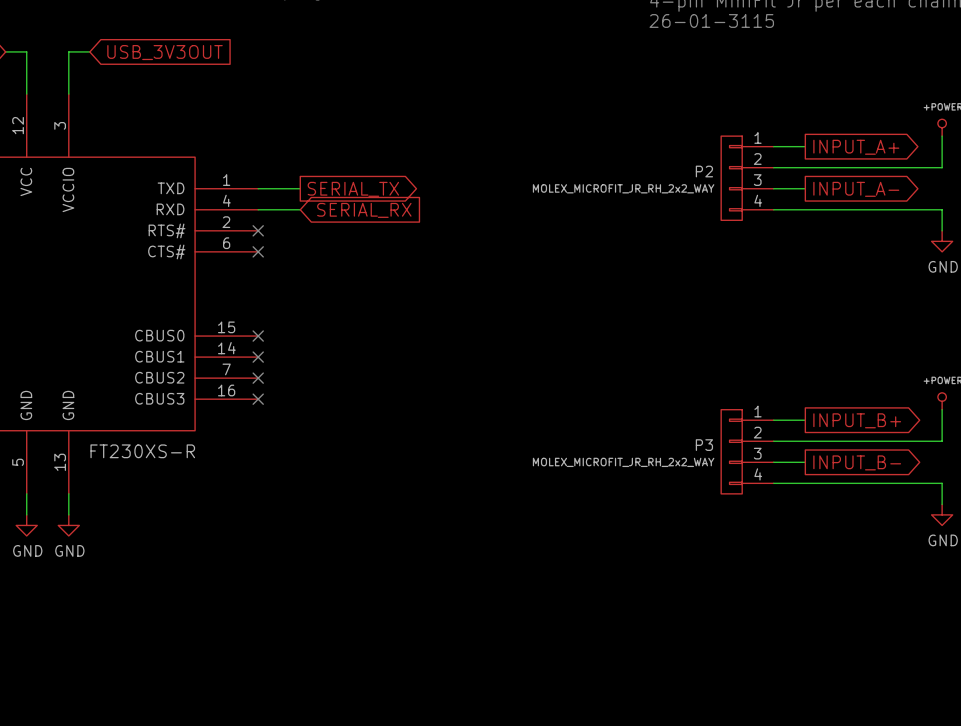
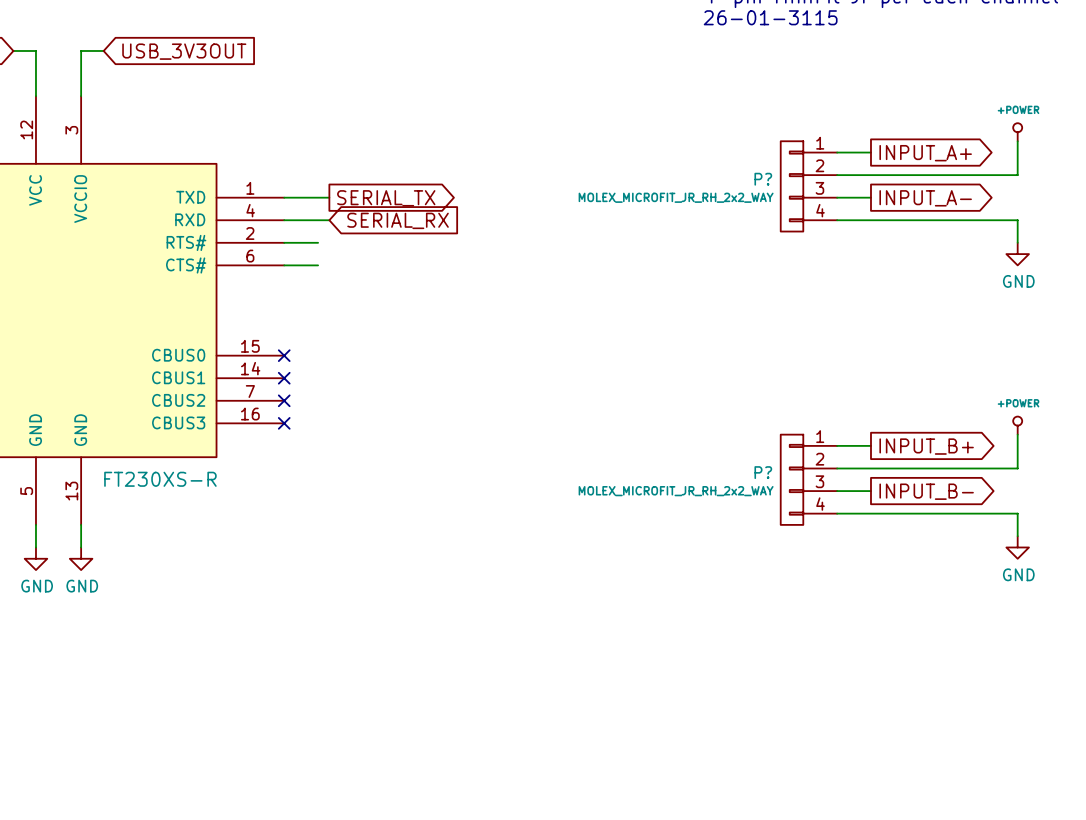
P2 name: P2 (704, 171) -> P? (763, 179)
wire: none -> (284, 242) (318, 242)
no-connect mark: (258, 230) -> none
wire: none -> (284, 265) (318, 265)
no-connect mark: (258, 251) -> none
P3 name: P3 (704, 445) -> P? (763, 472)

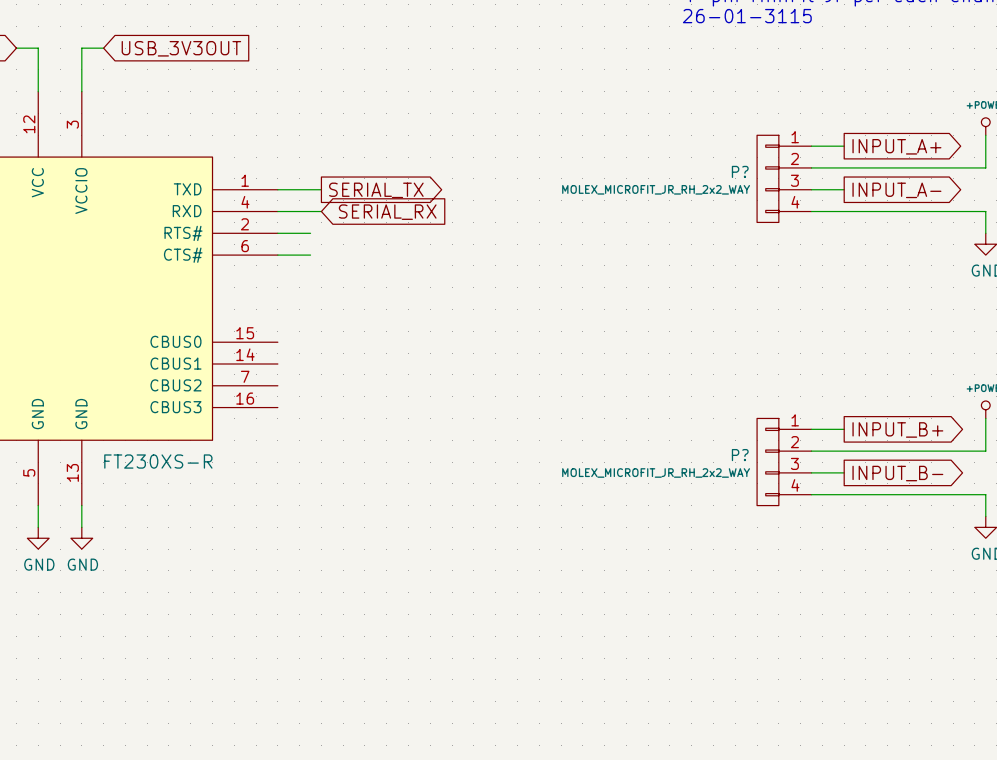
no-connect mark: (284, 355) -> none
no-connect mark: (284, 378) -> none
no-connect mark: (284, 400) -> none
no-connect mark: (284, 423) -> none

